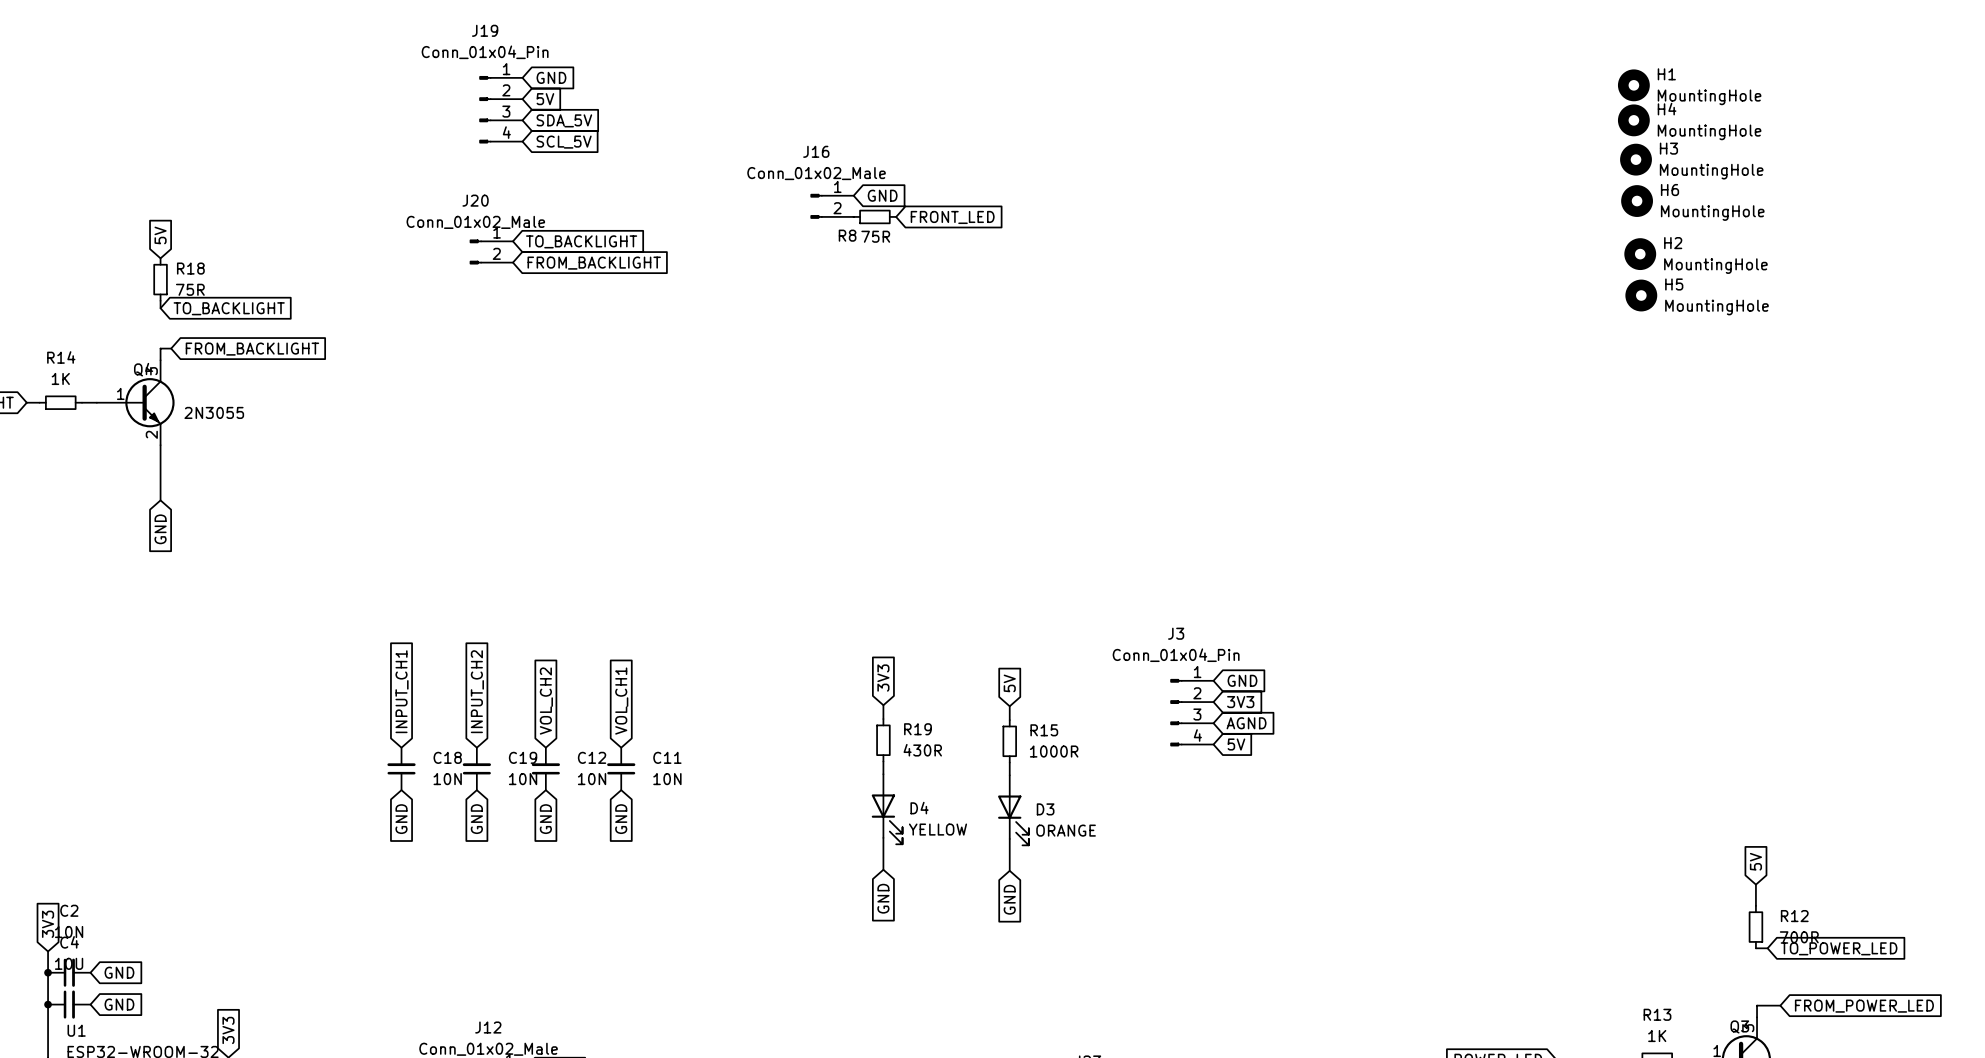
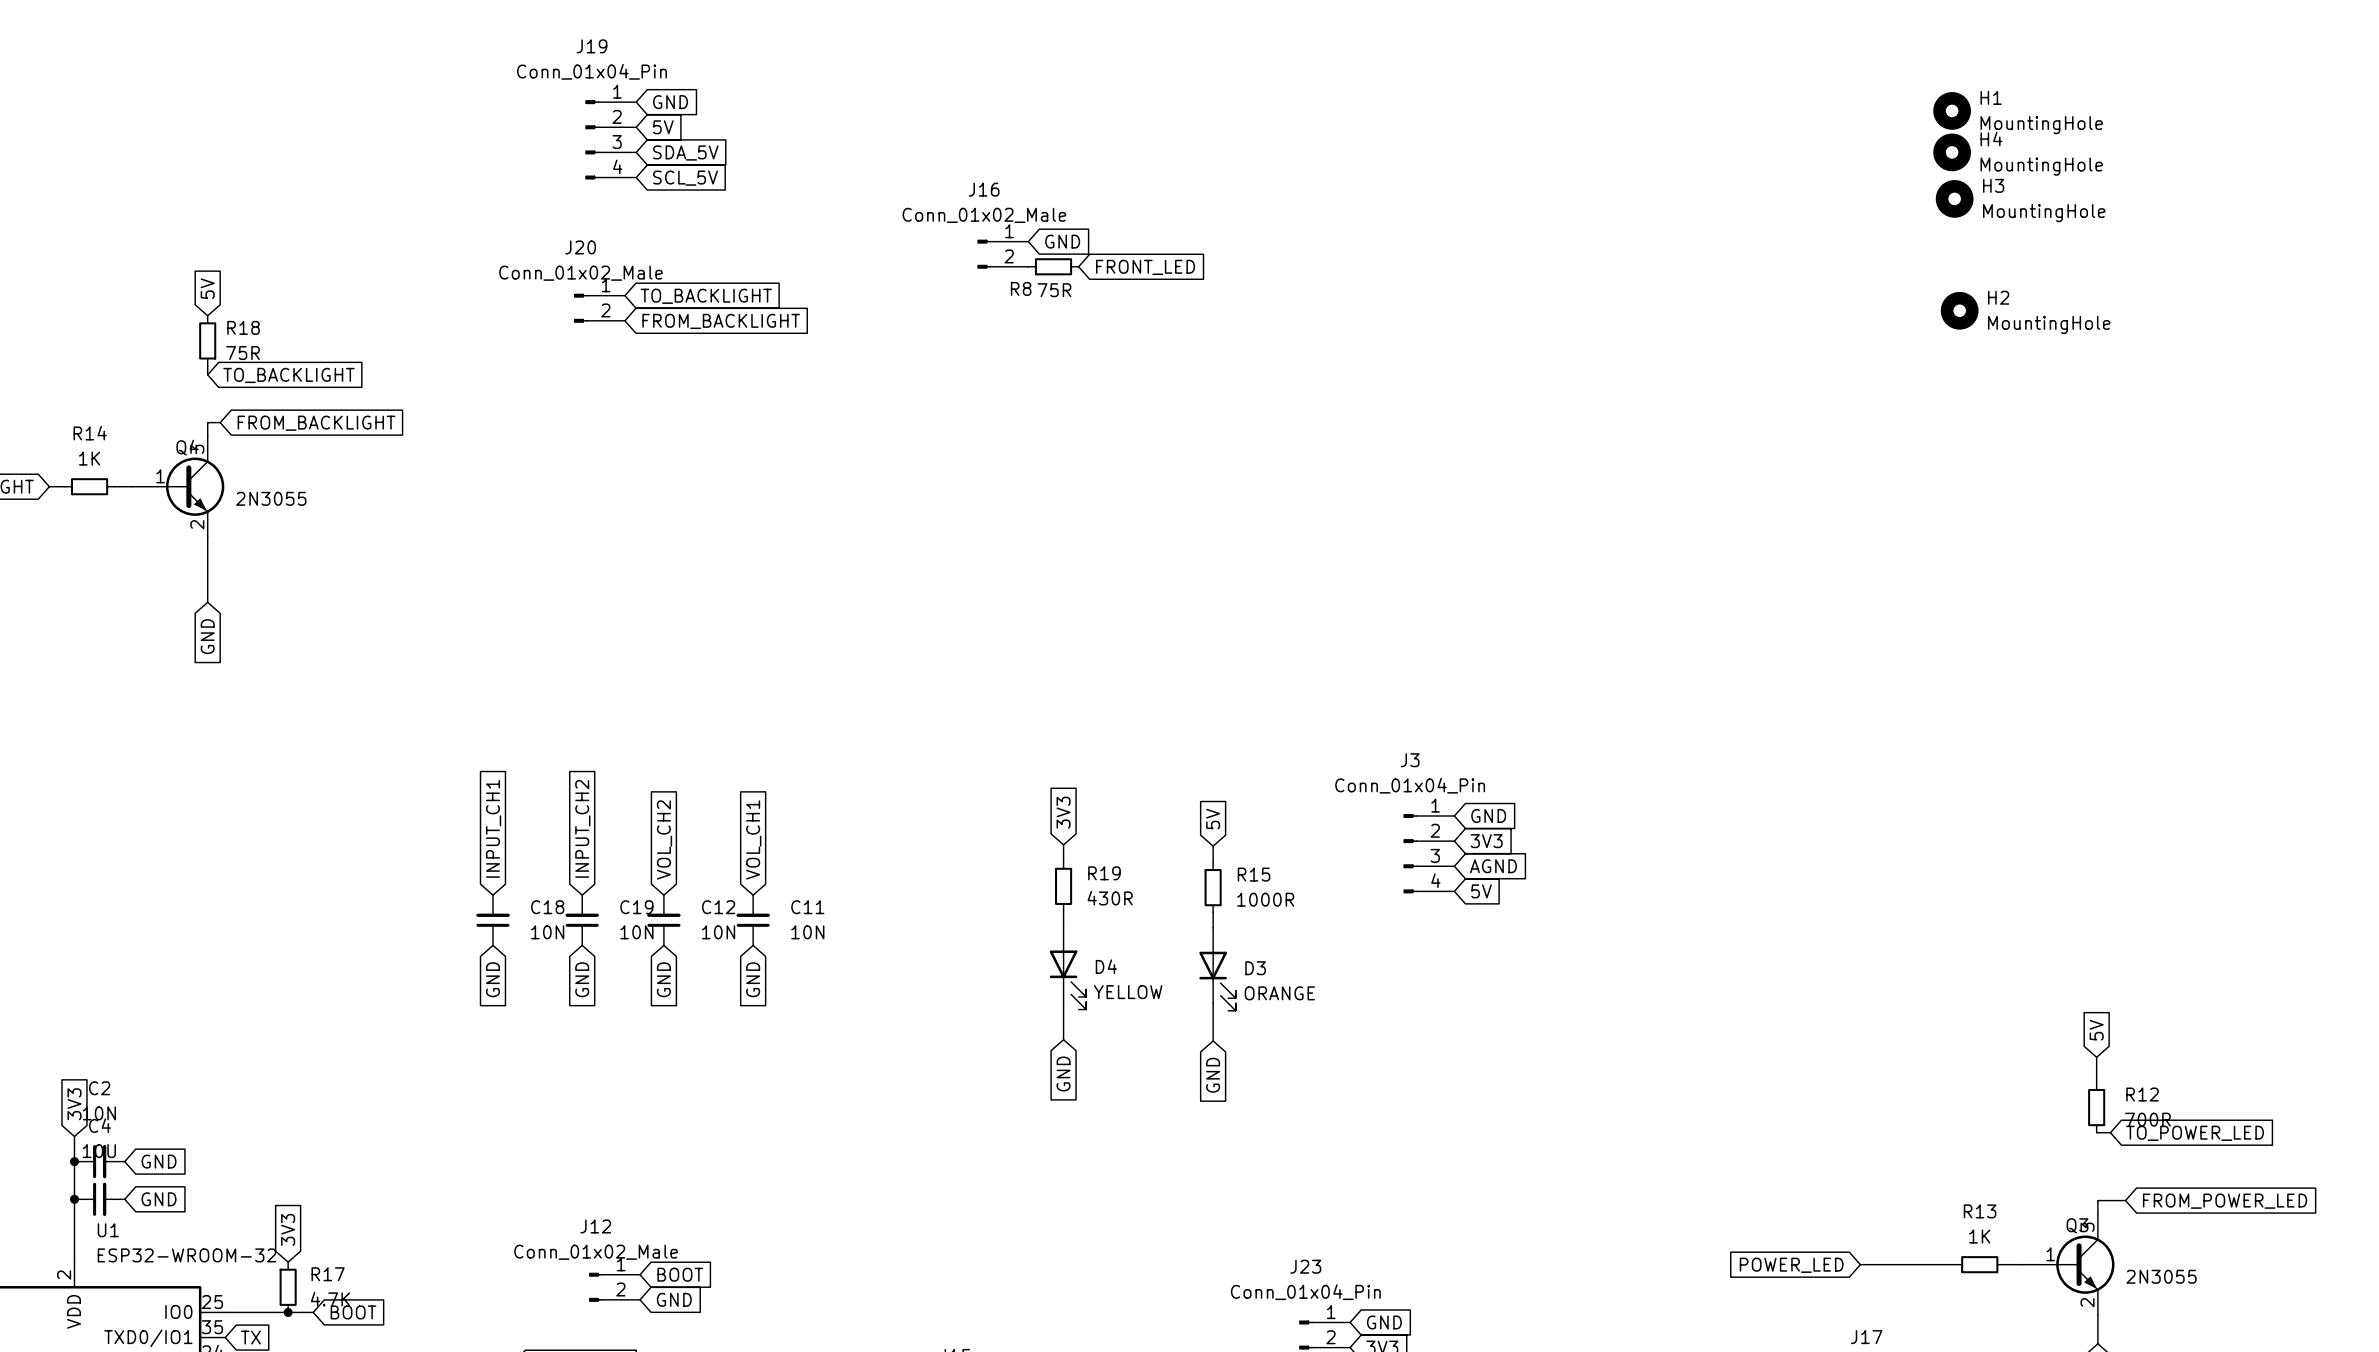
H6: MountingHole (1637, 201) -> none
H5: MountingHole (1641, 295) -> none

